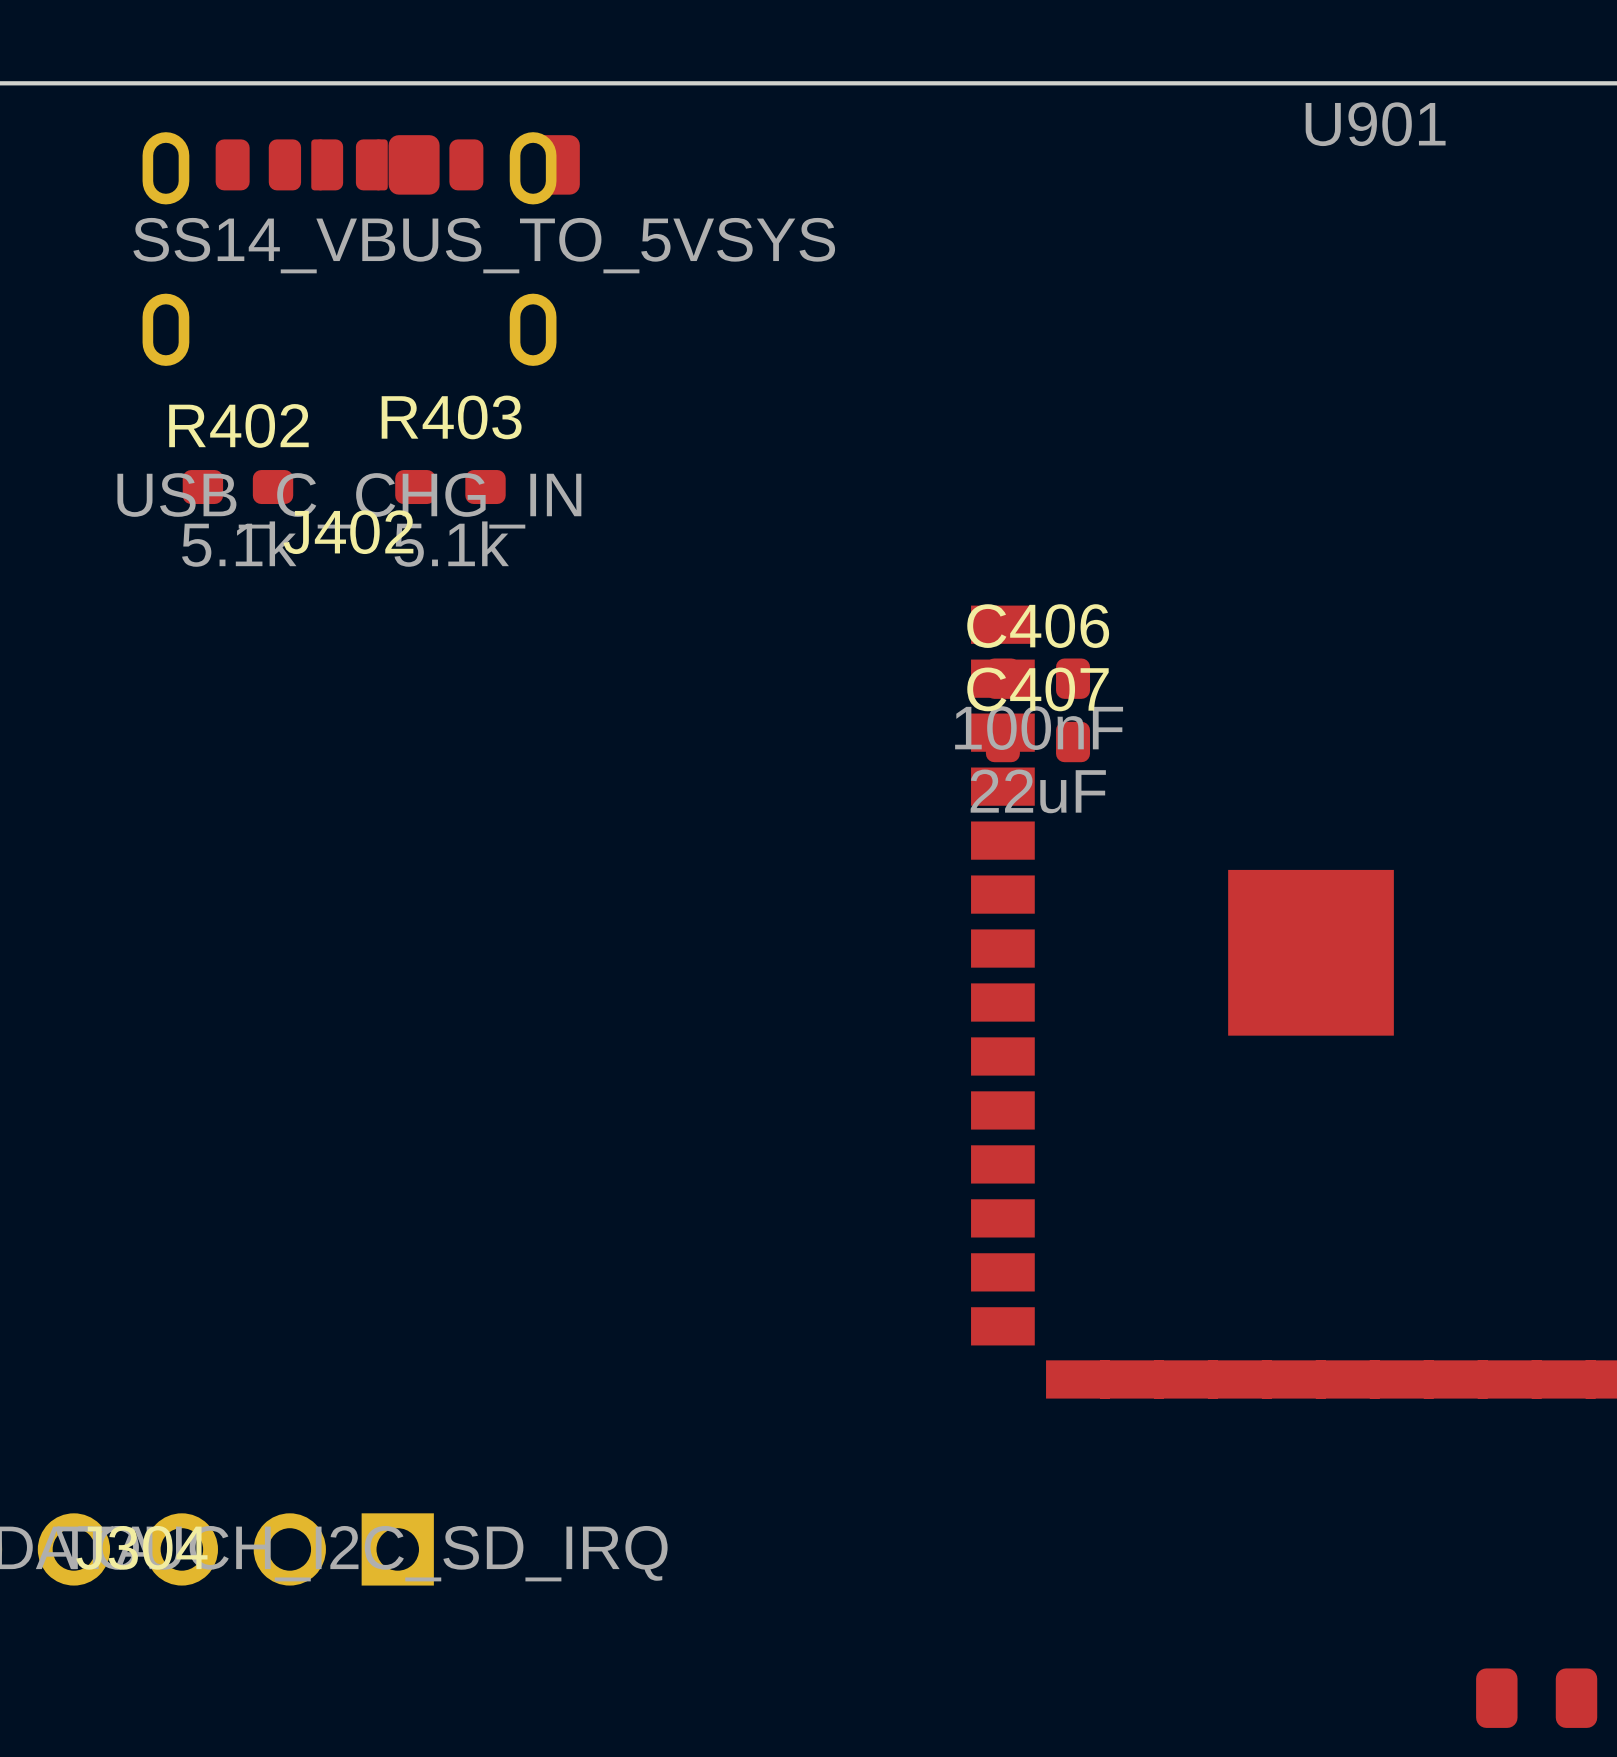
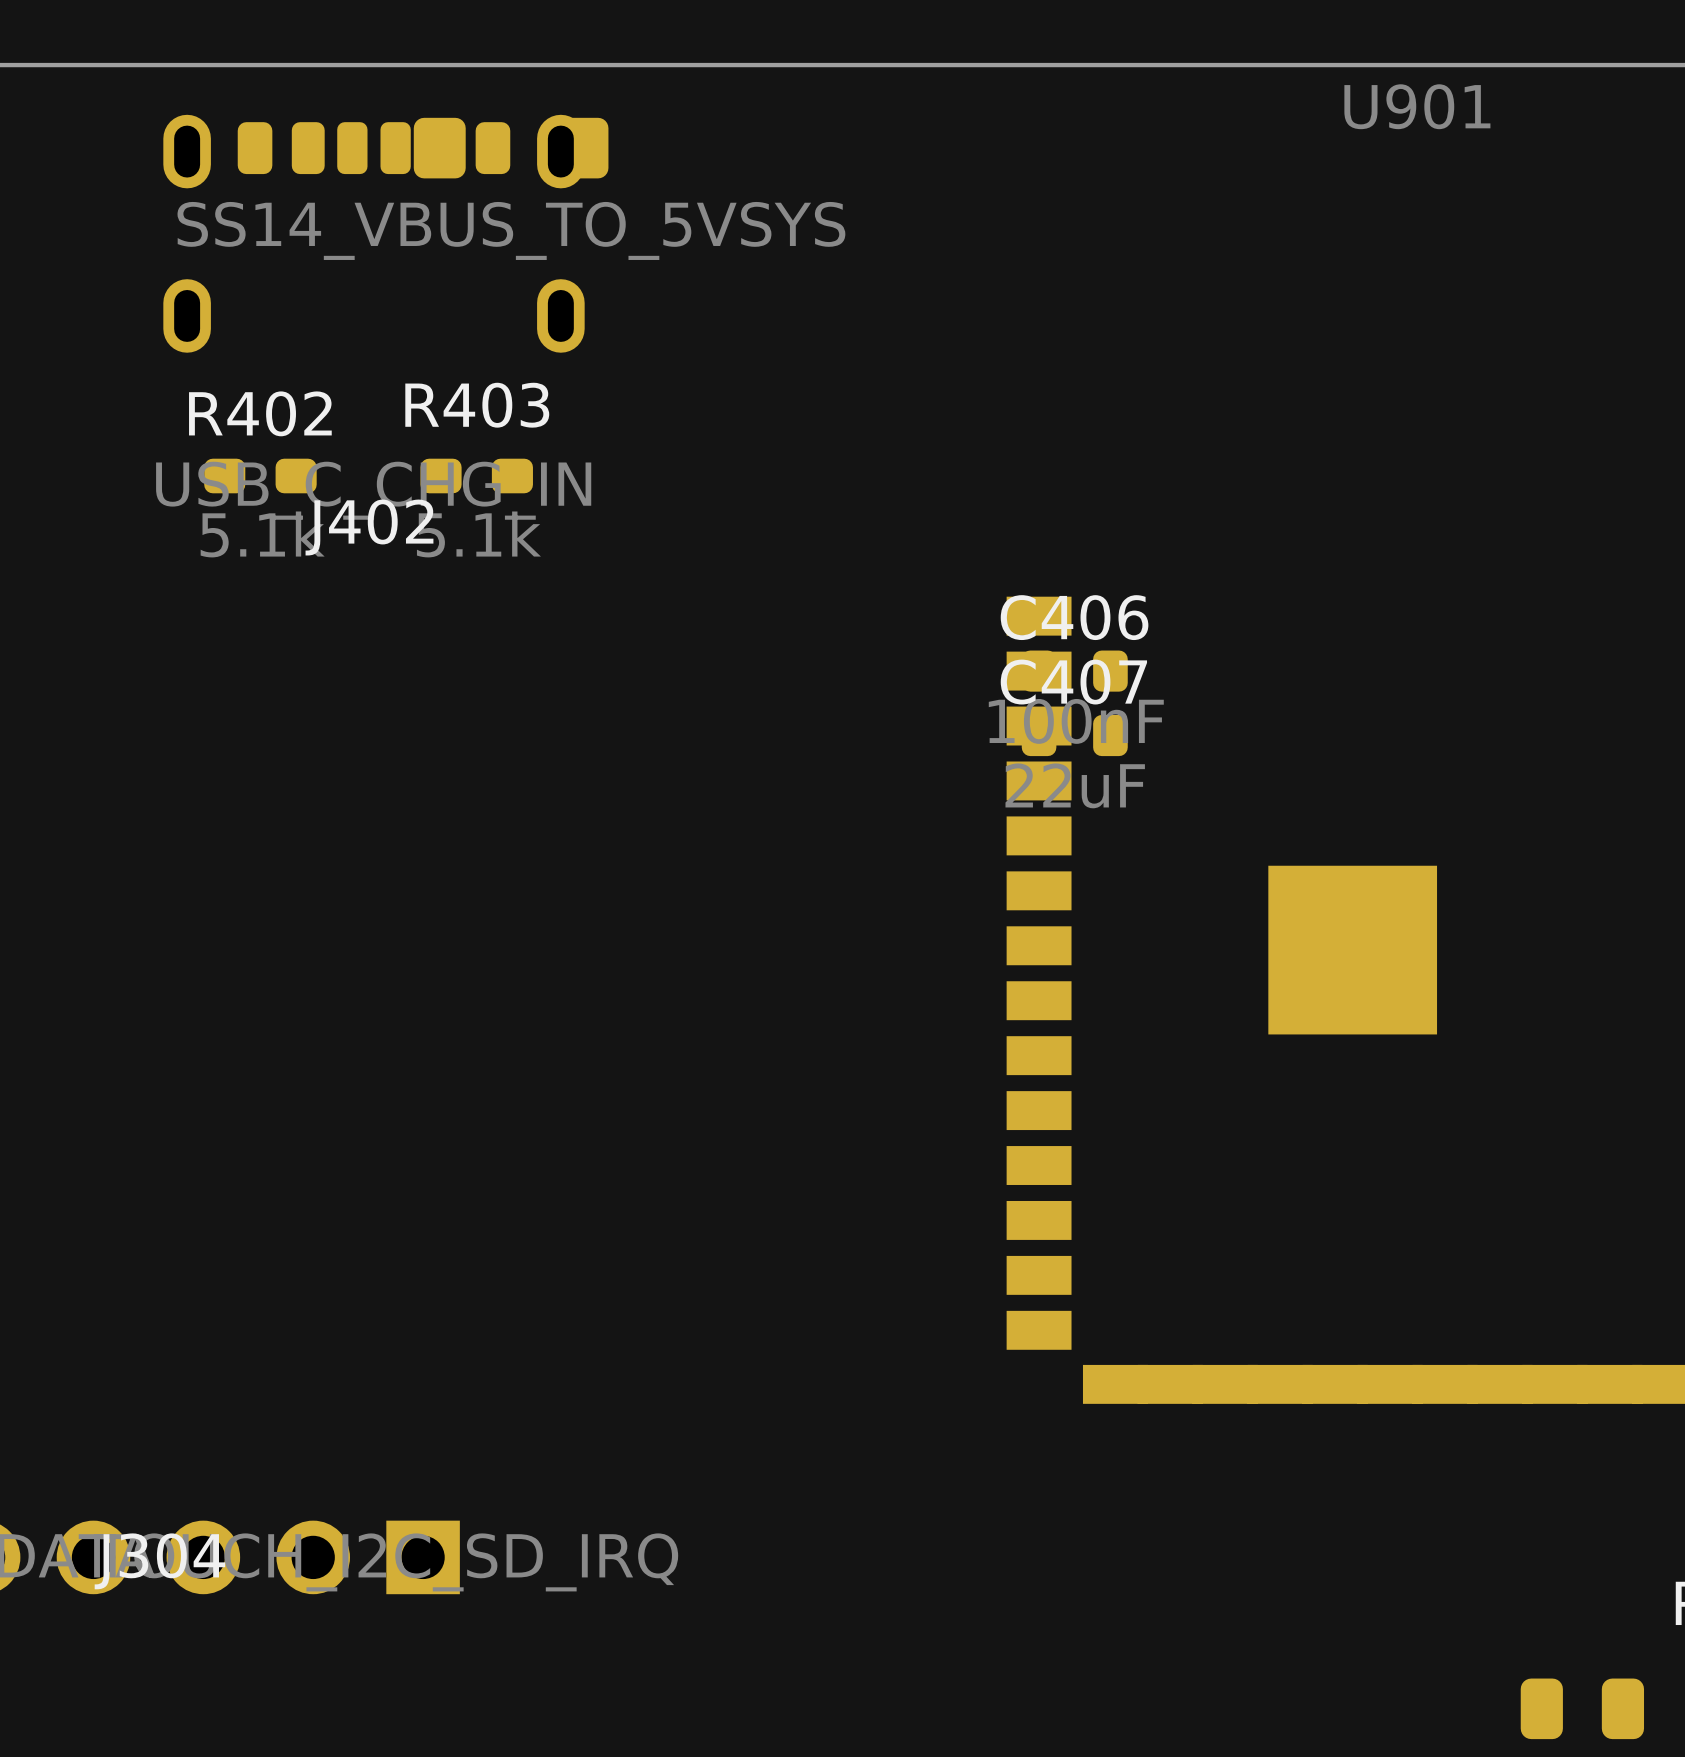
J402 footprint: [142, 132, 557, 366] -> [163, 114, 585, 353]

